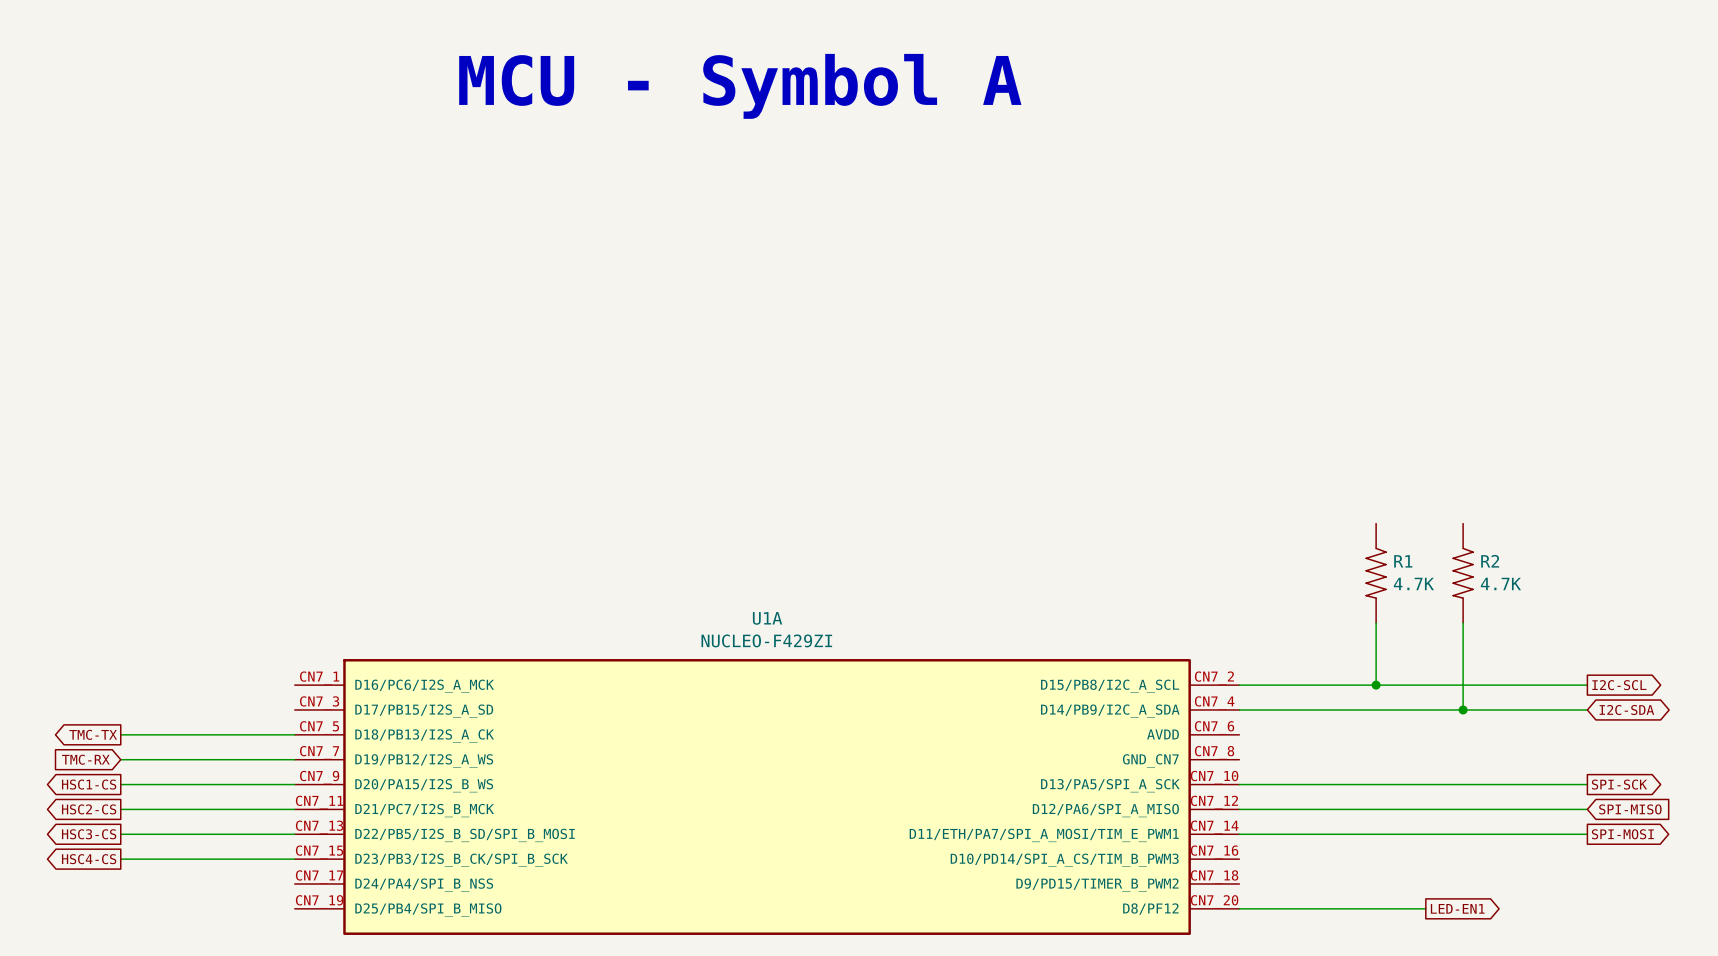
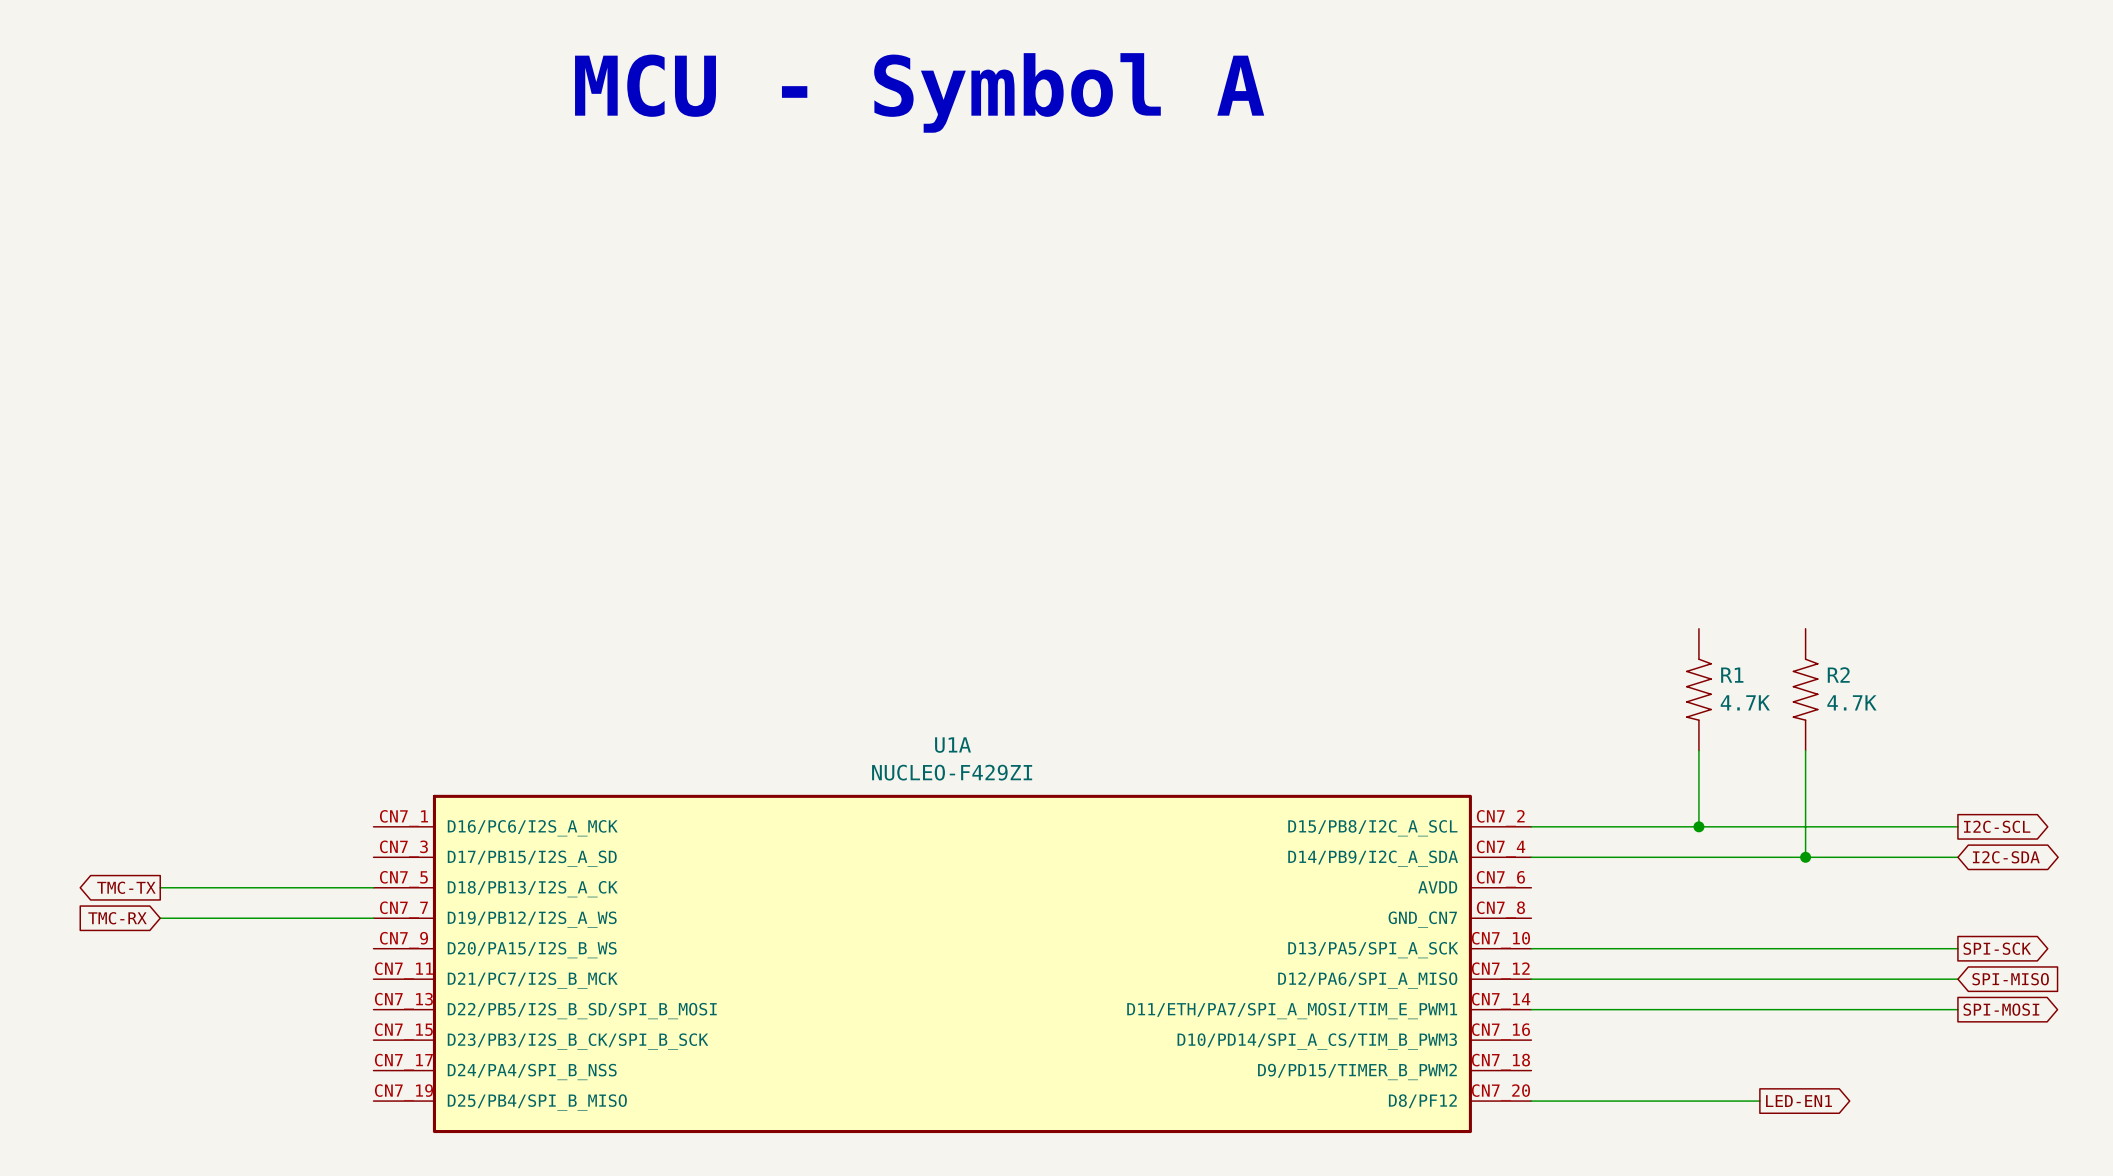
global label: HSC1-CS (89, 784) -> none
wire: (120, 784) (294, 784) -> none
global label: HSC2-CS (89, 809) -> none
wire: (120, 809) (294, 809) -> none
global label: HSC3-CS (89, 834) -> none
wire: (120, 834) (294, 834) -> none
global label: HSC4-CS (89, 859) -> none
wire: (120, 859) (294, 859) -> none

